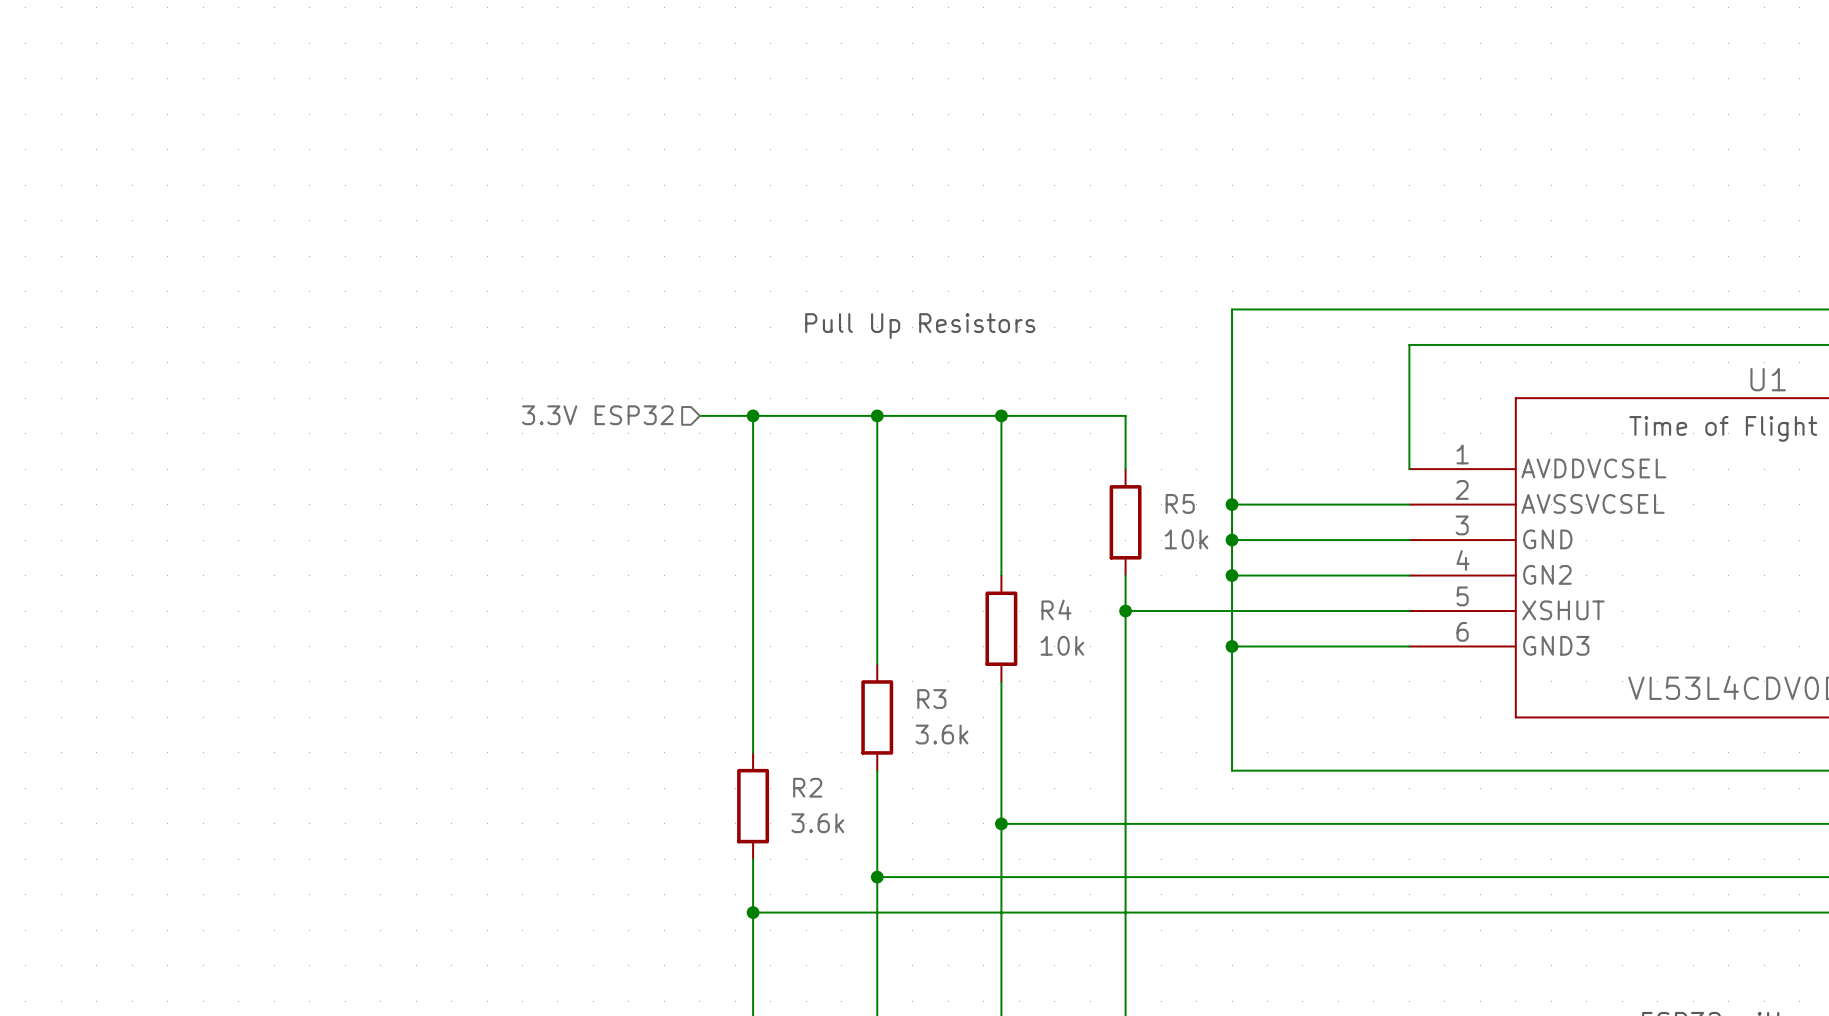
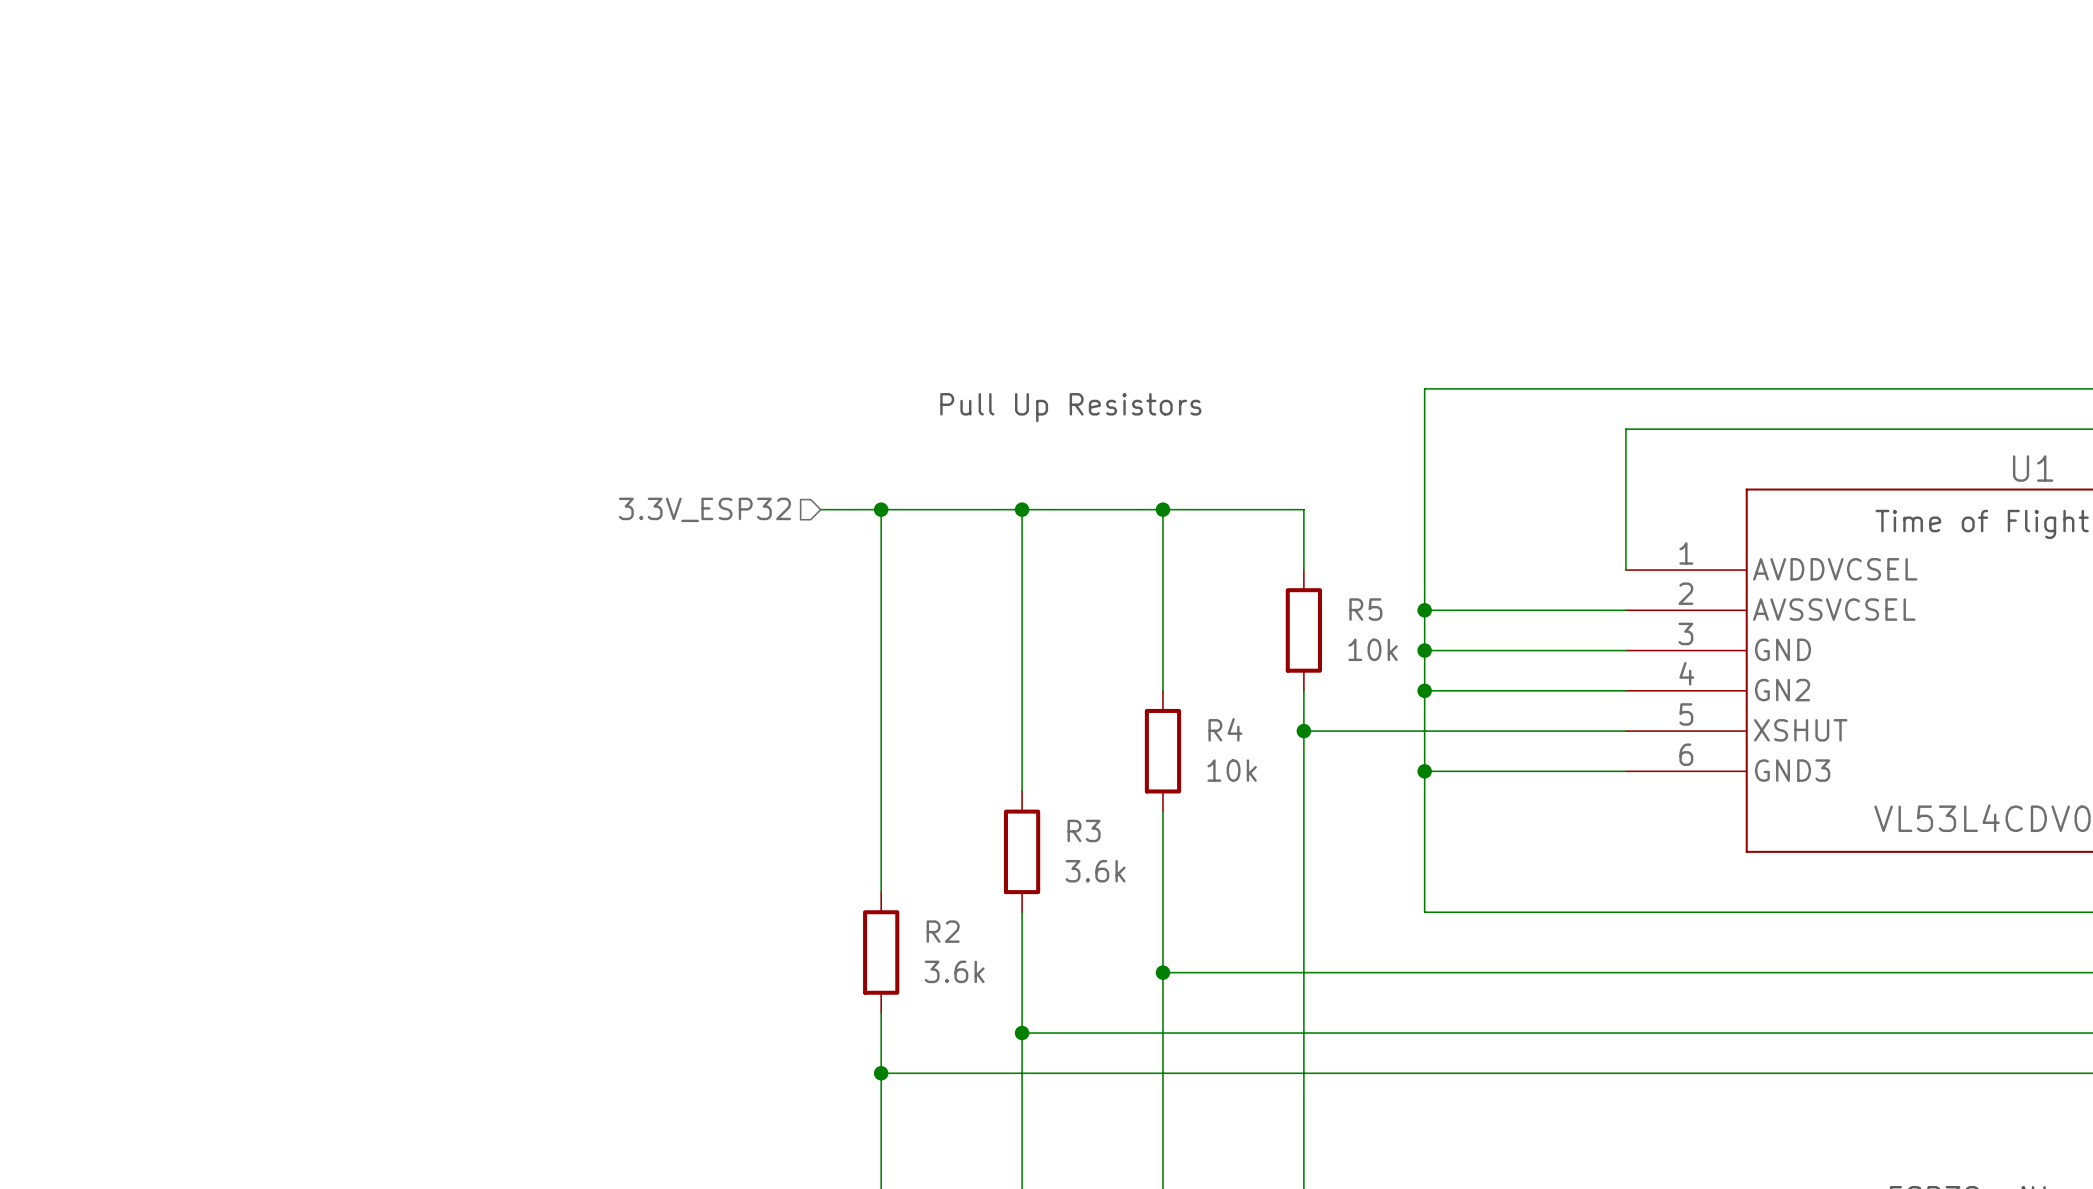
hierarchical label: 3.3V ESP32 (597, 415) -> 3.3V_ESP32 (704, 509)

